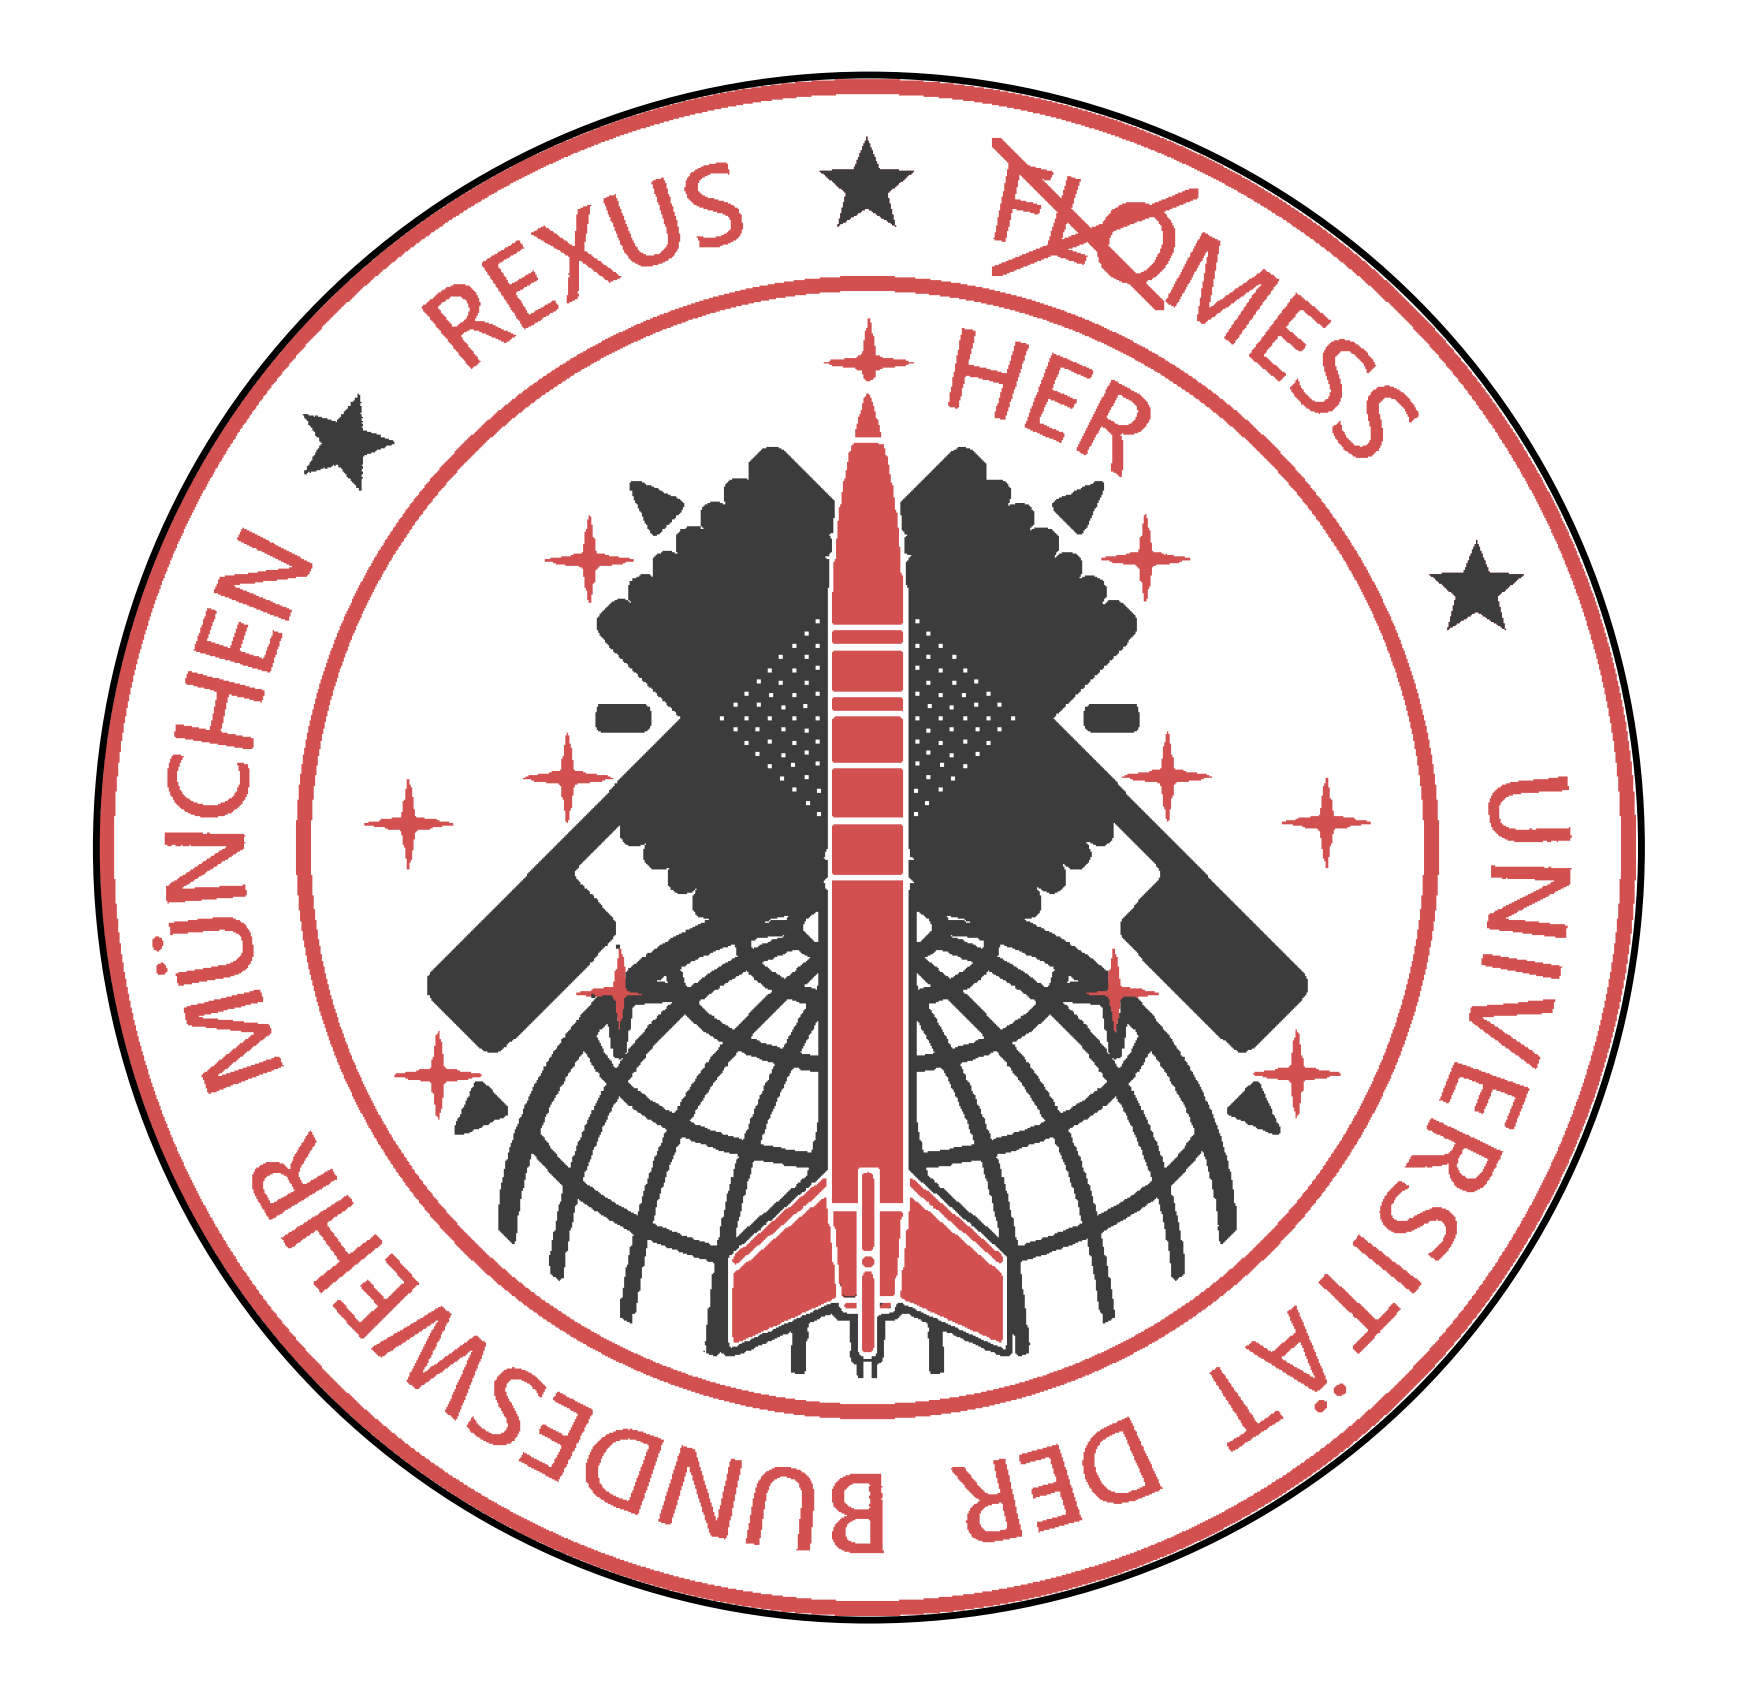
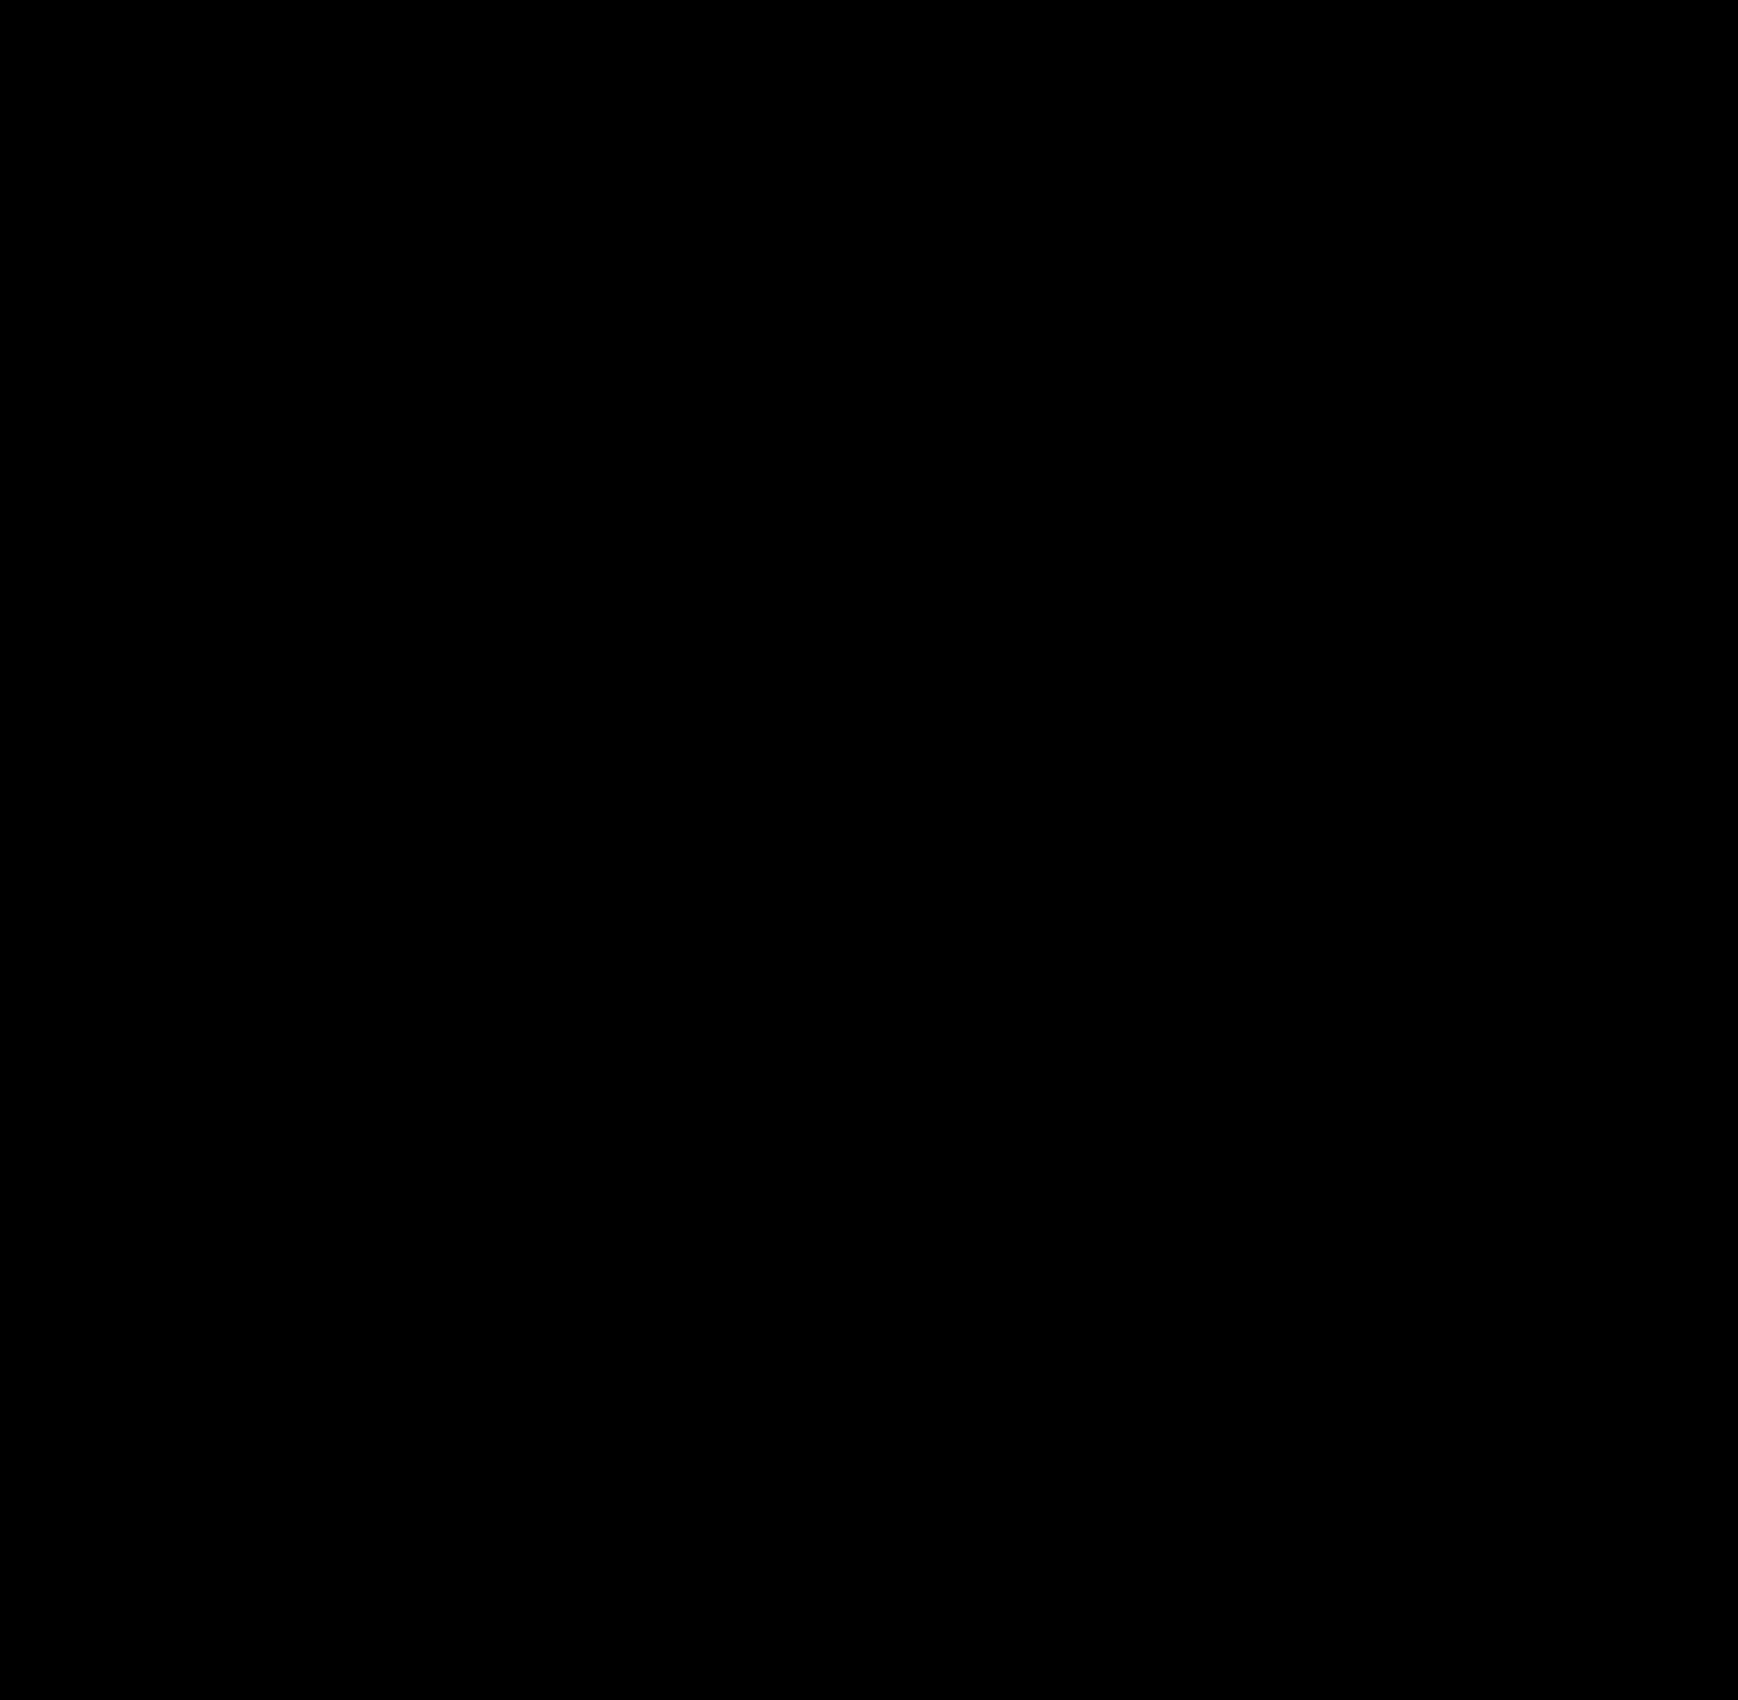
round board edge: [92, 71, 1645, 1624] -> none
drawing: [99, 79, 1636, 1617] -> none
drawing: [819, 136, 915, 227] -> none
drawing: [421, 162, 744, 369] -> none
drawing: [1429, 539, 1524, 631] -> none
drawing: [1281, 777, 1371, 869] -> none
drawing: [364, 779, 454, 870] -> none
drawing: [252, 1130, 884, 1554] -> none
drawing: [950, 1416, 1163, 1543] -> none

